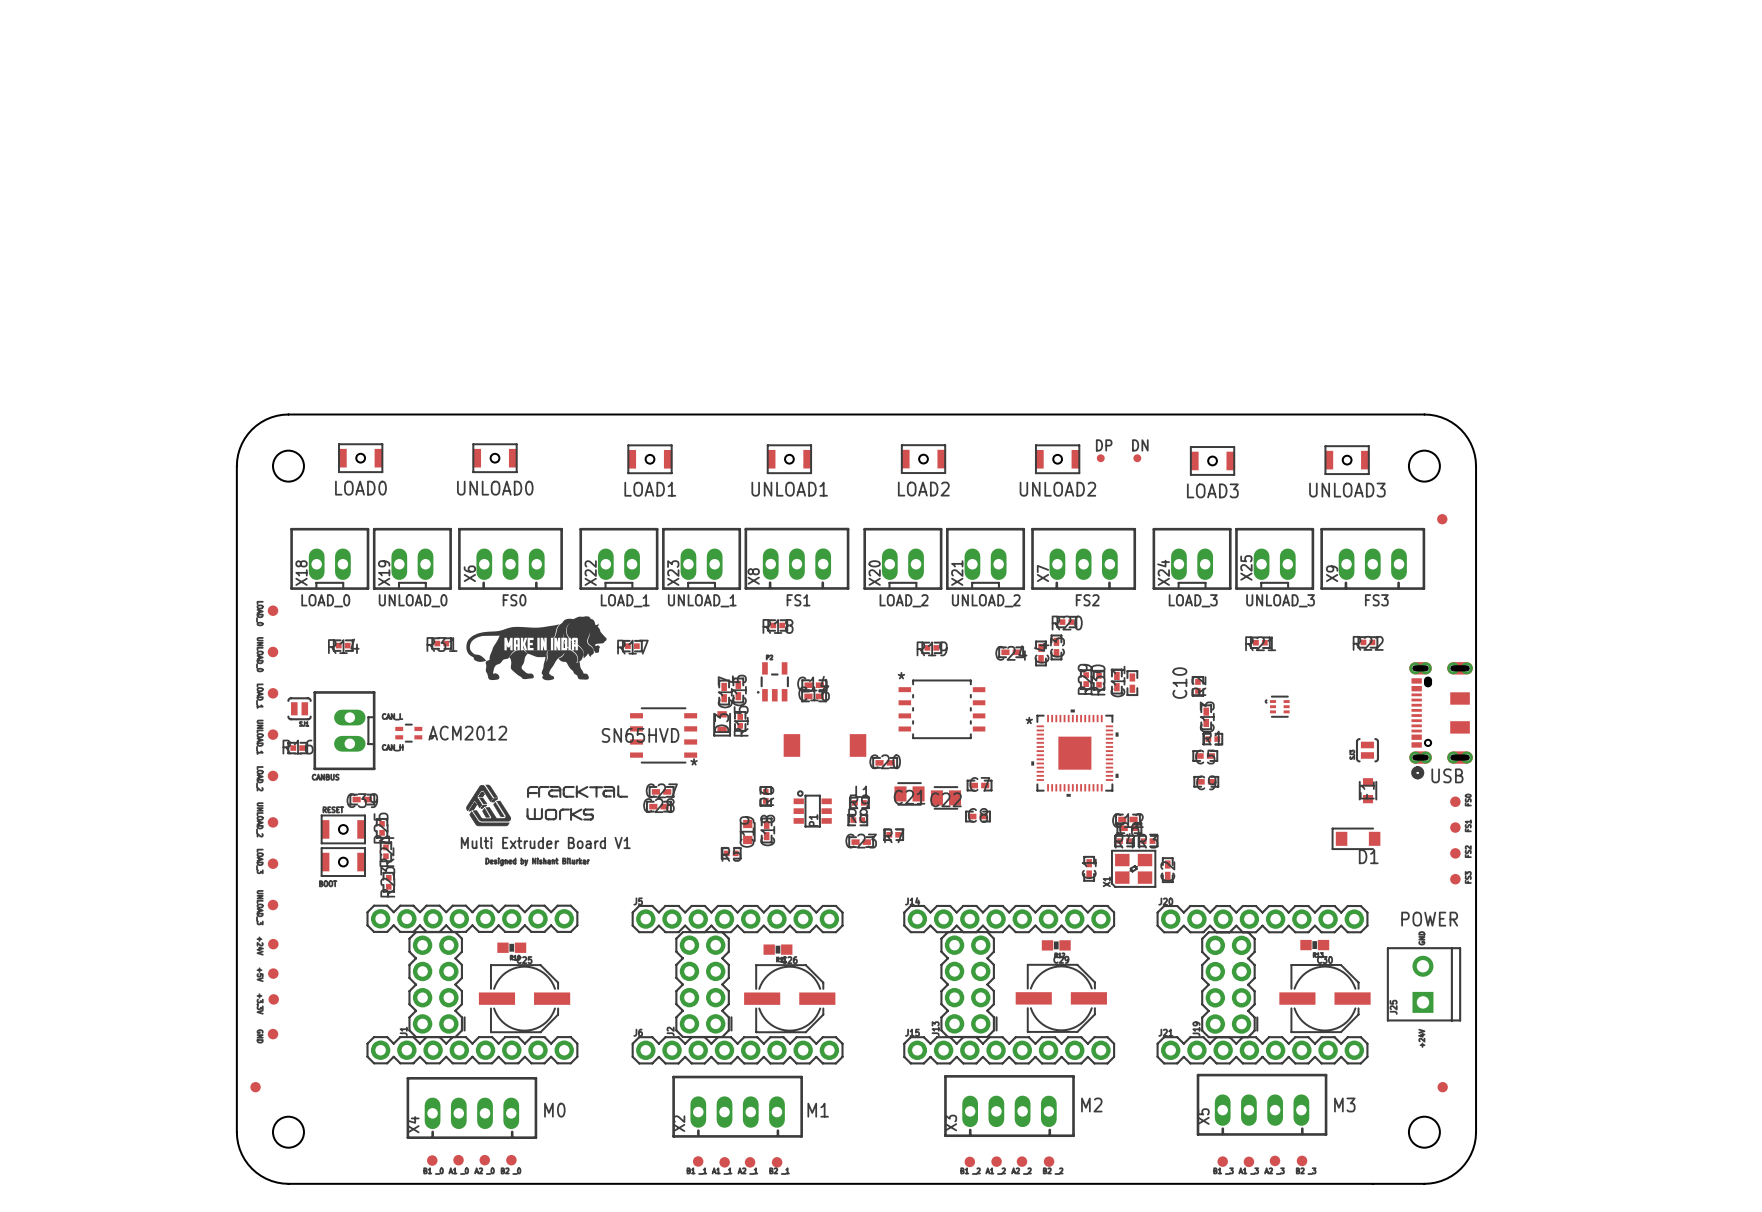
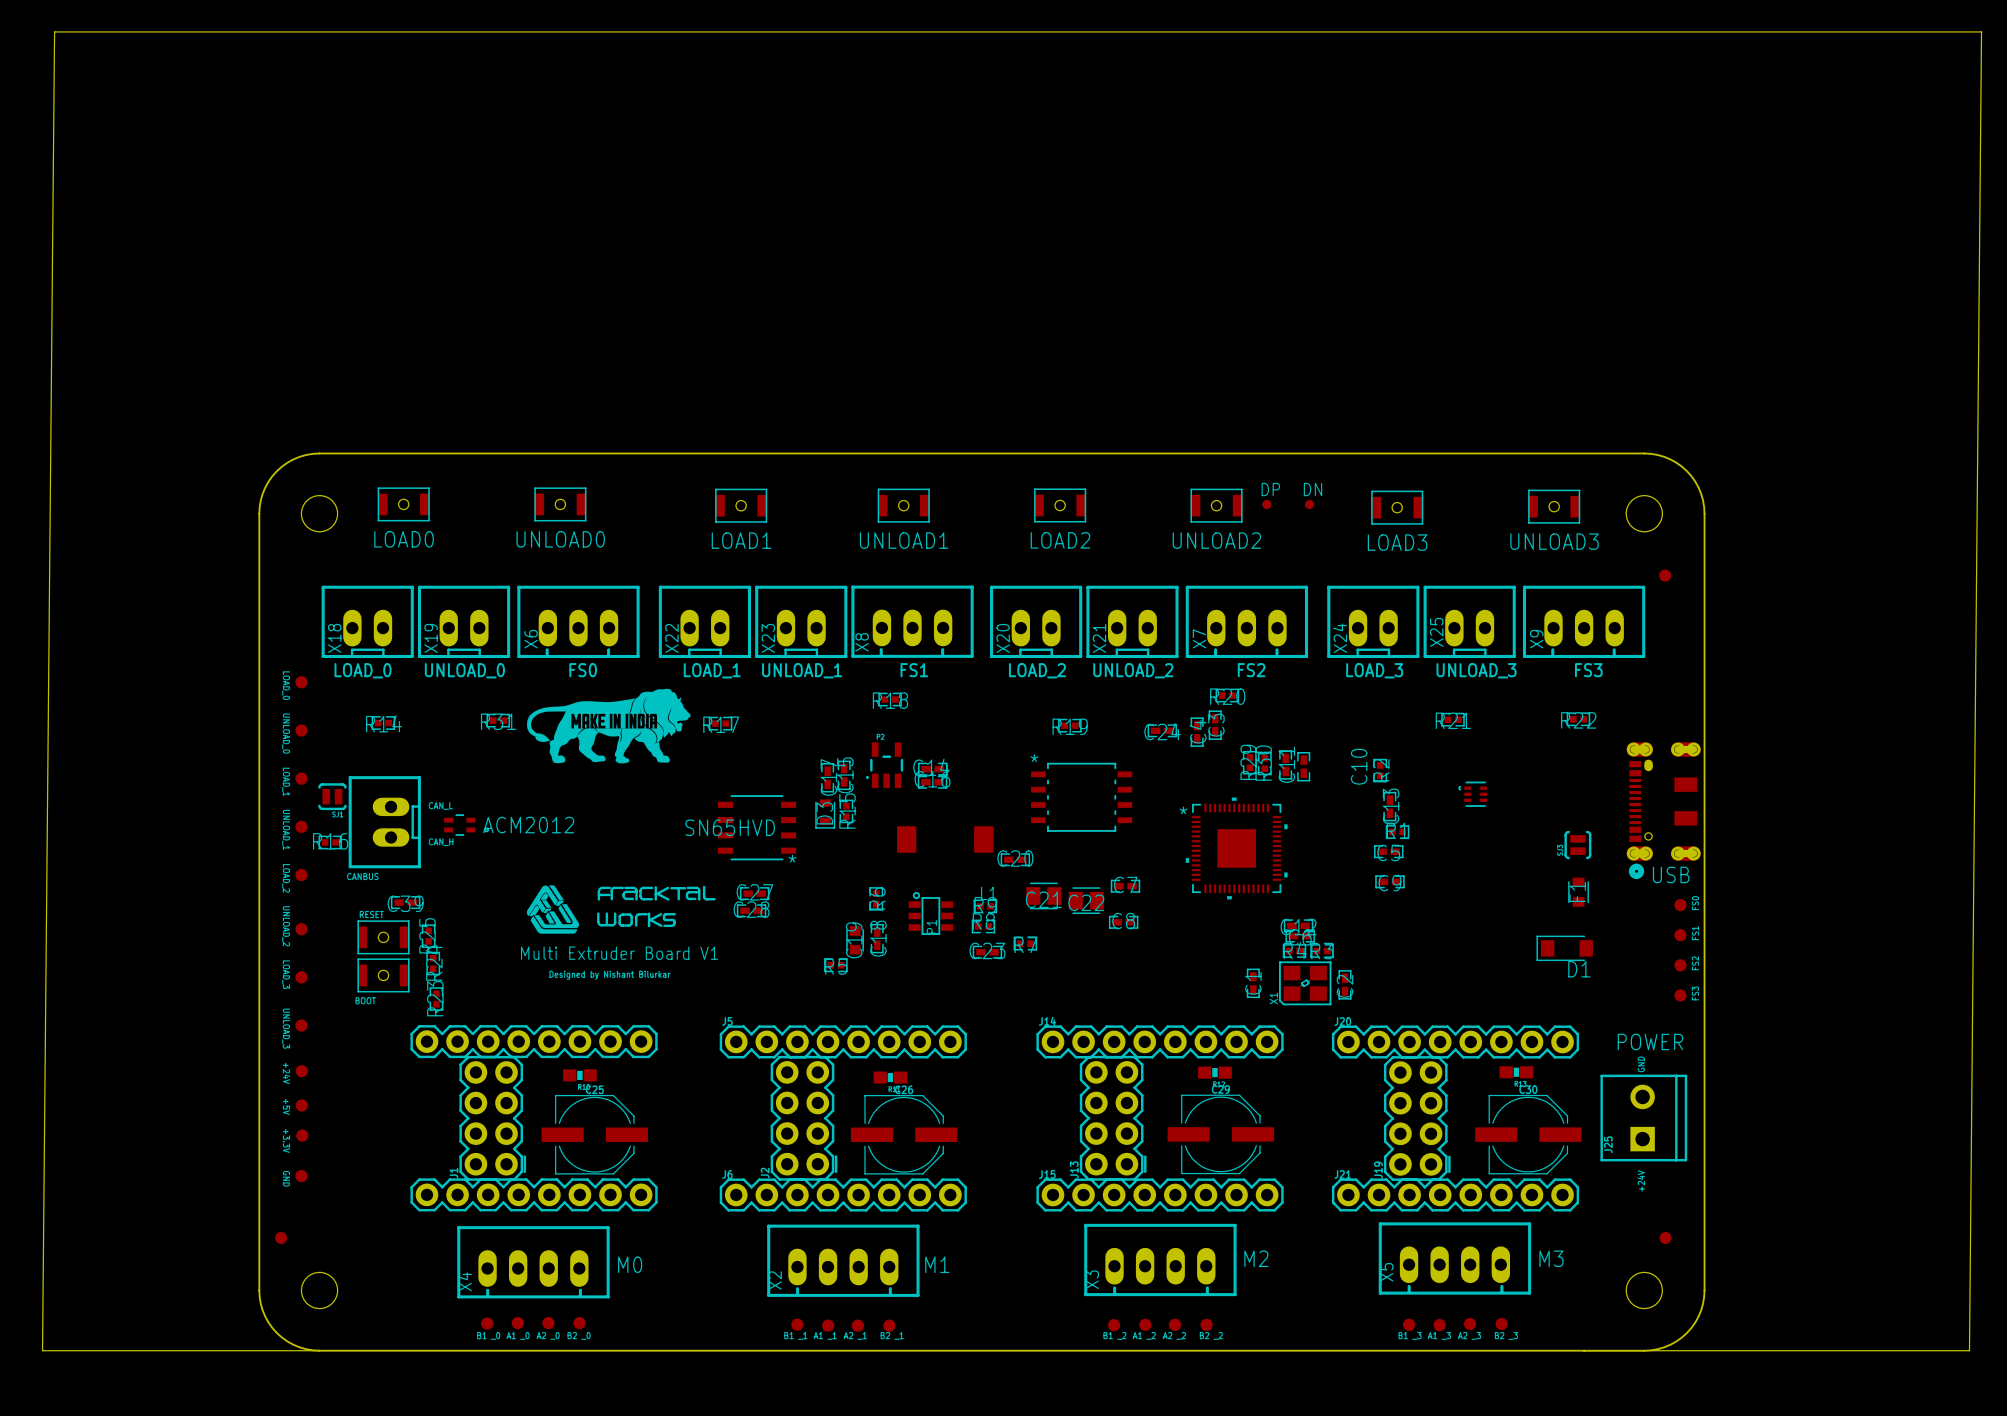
board edge: none -> (319, 1350) (42, 1350) (54, 31) (1981, 31) (1969, 1350) (1584, 1350)

